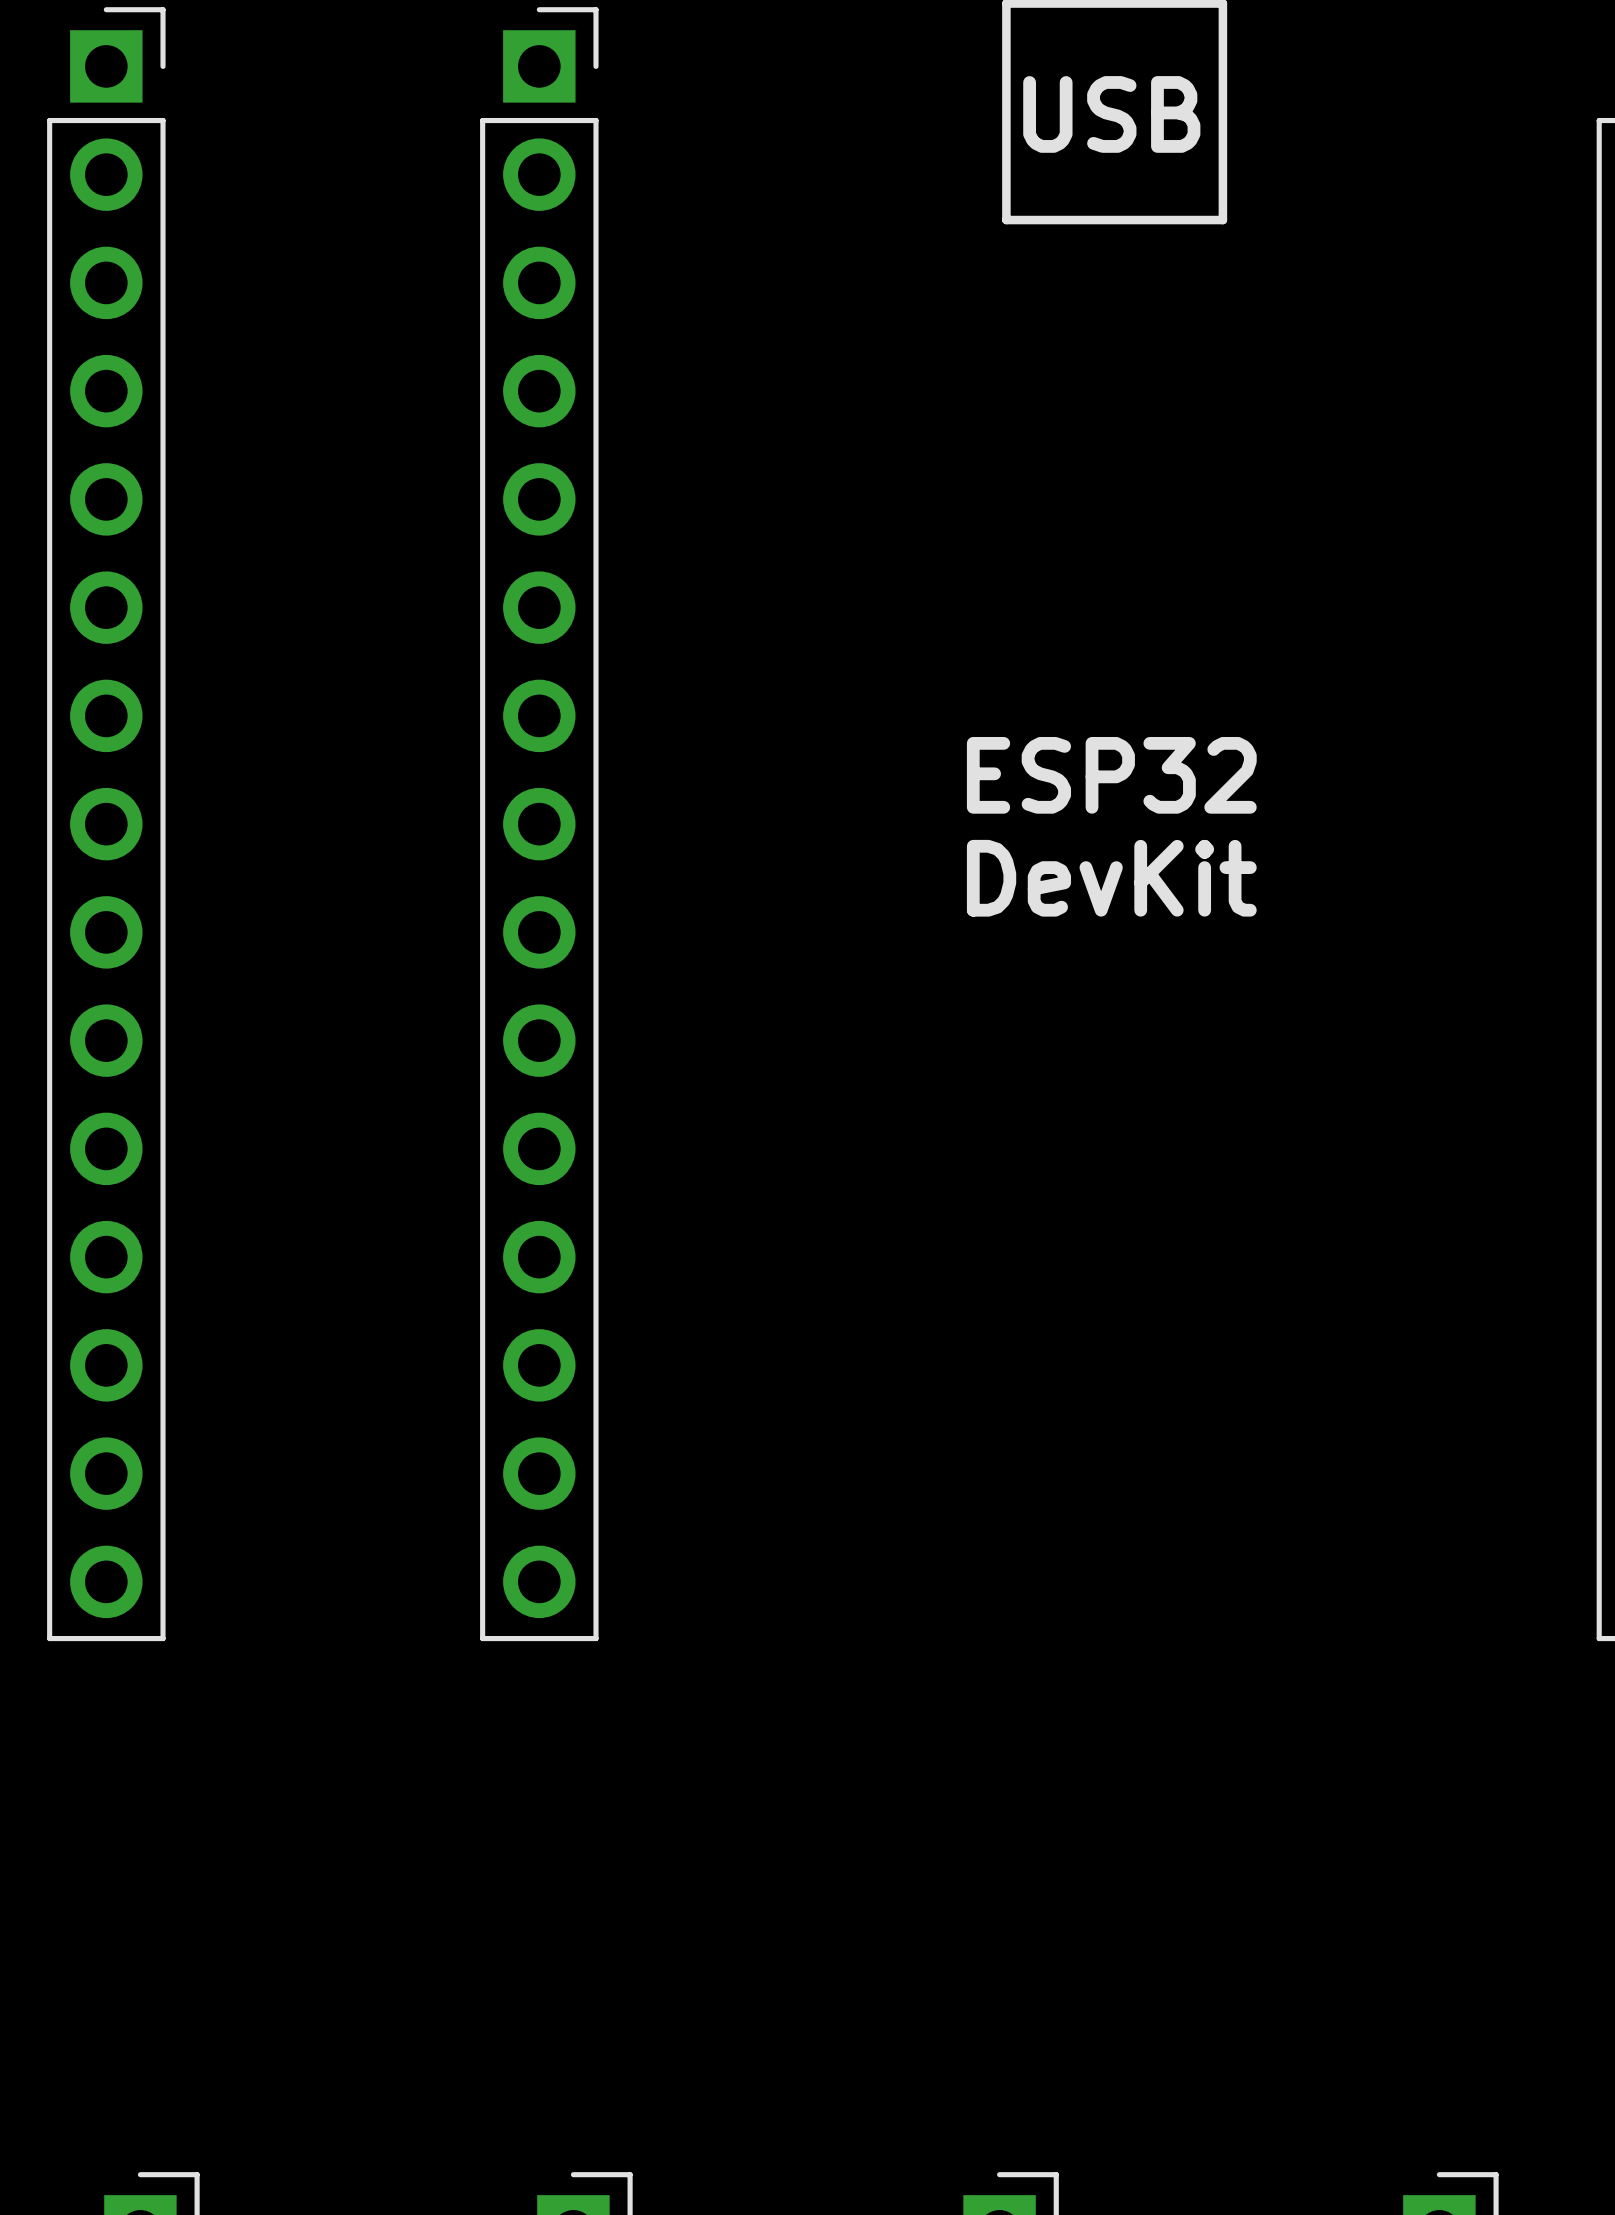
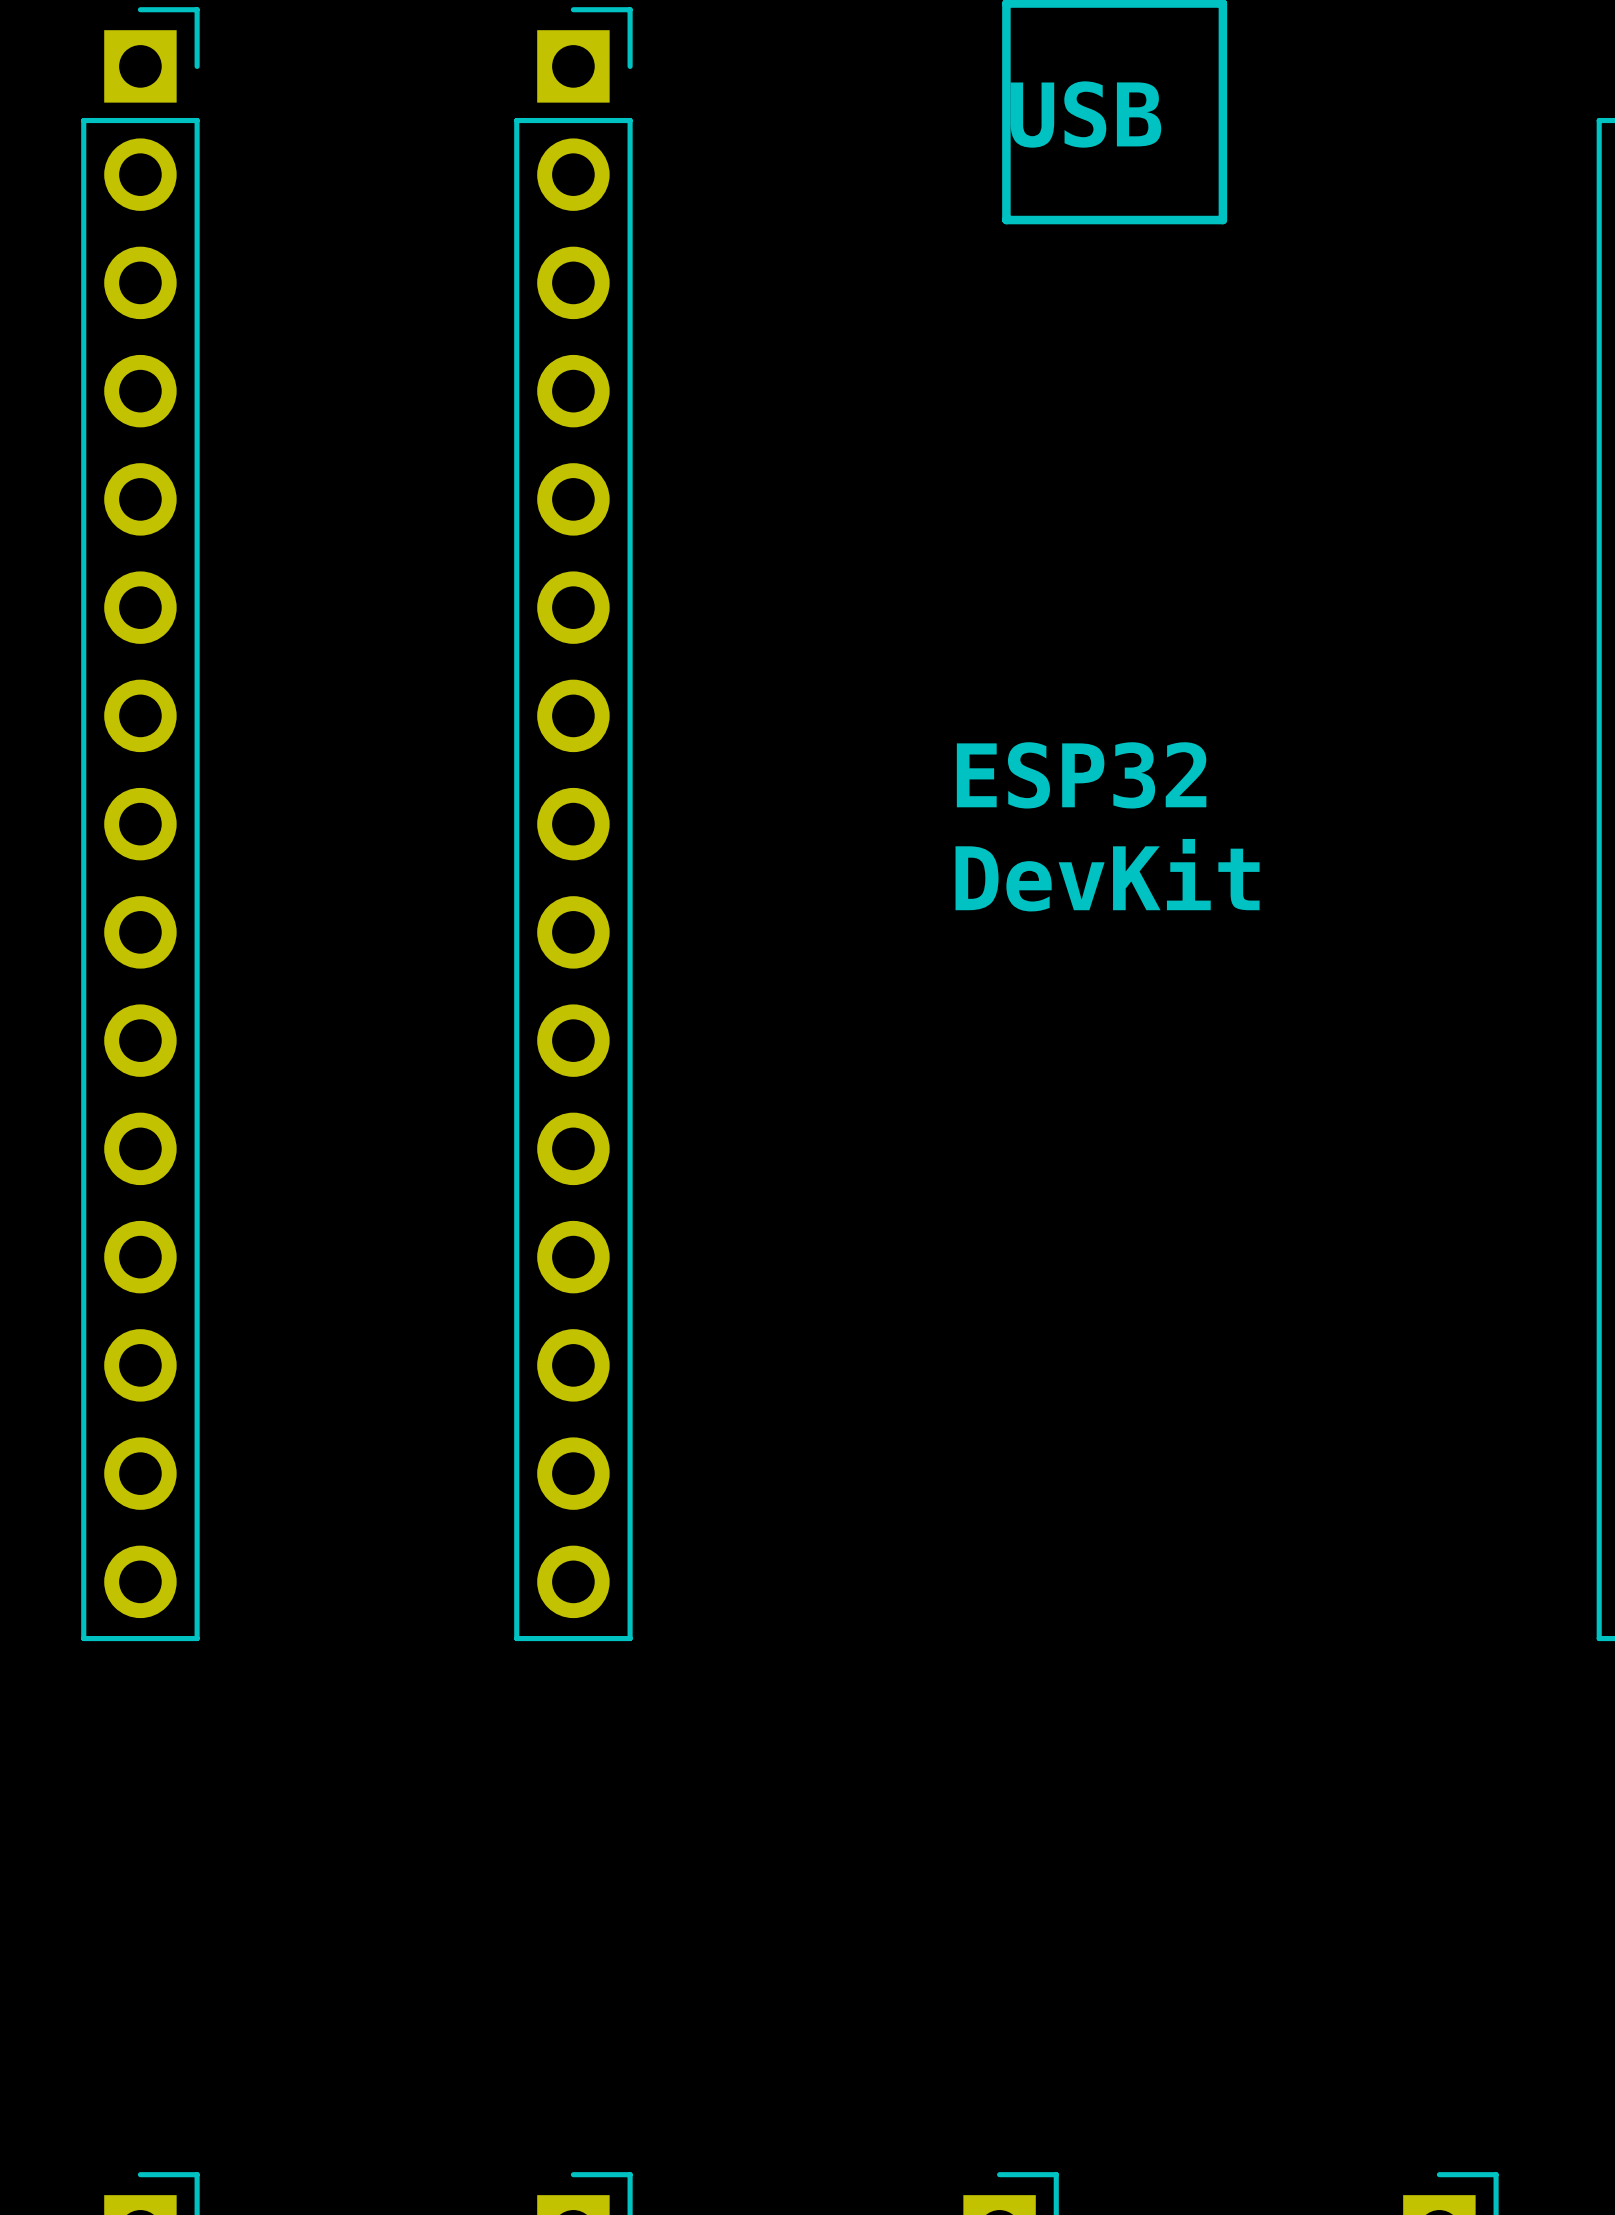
part position: (106, 824) -> (140, 824)
part position: (539, 824) -> (573, 824)

